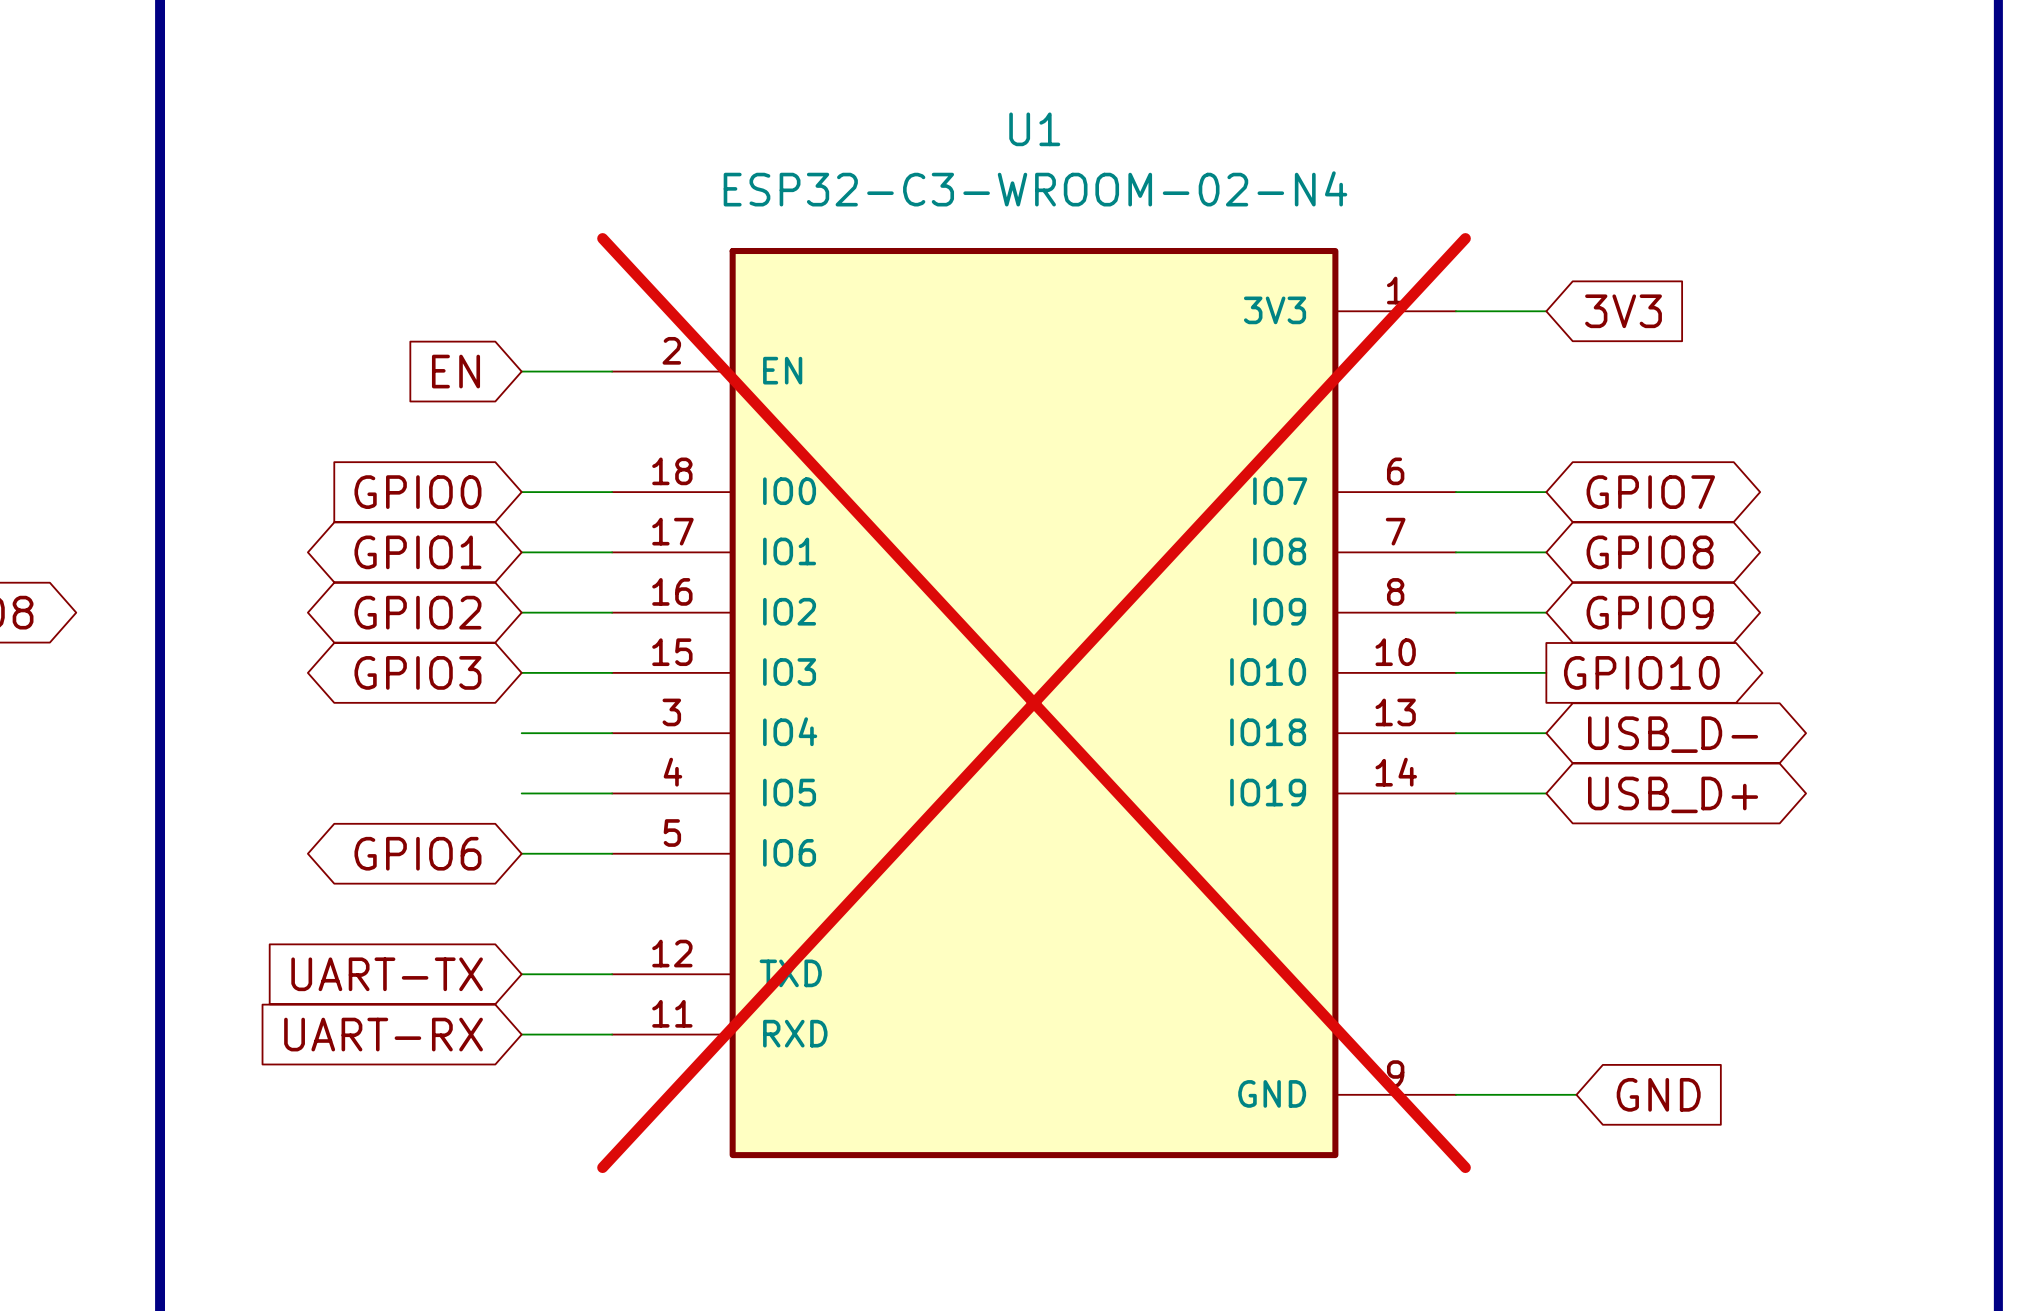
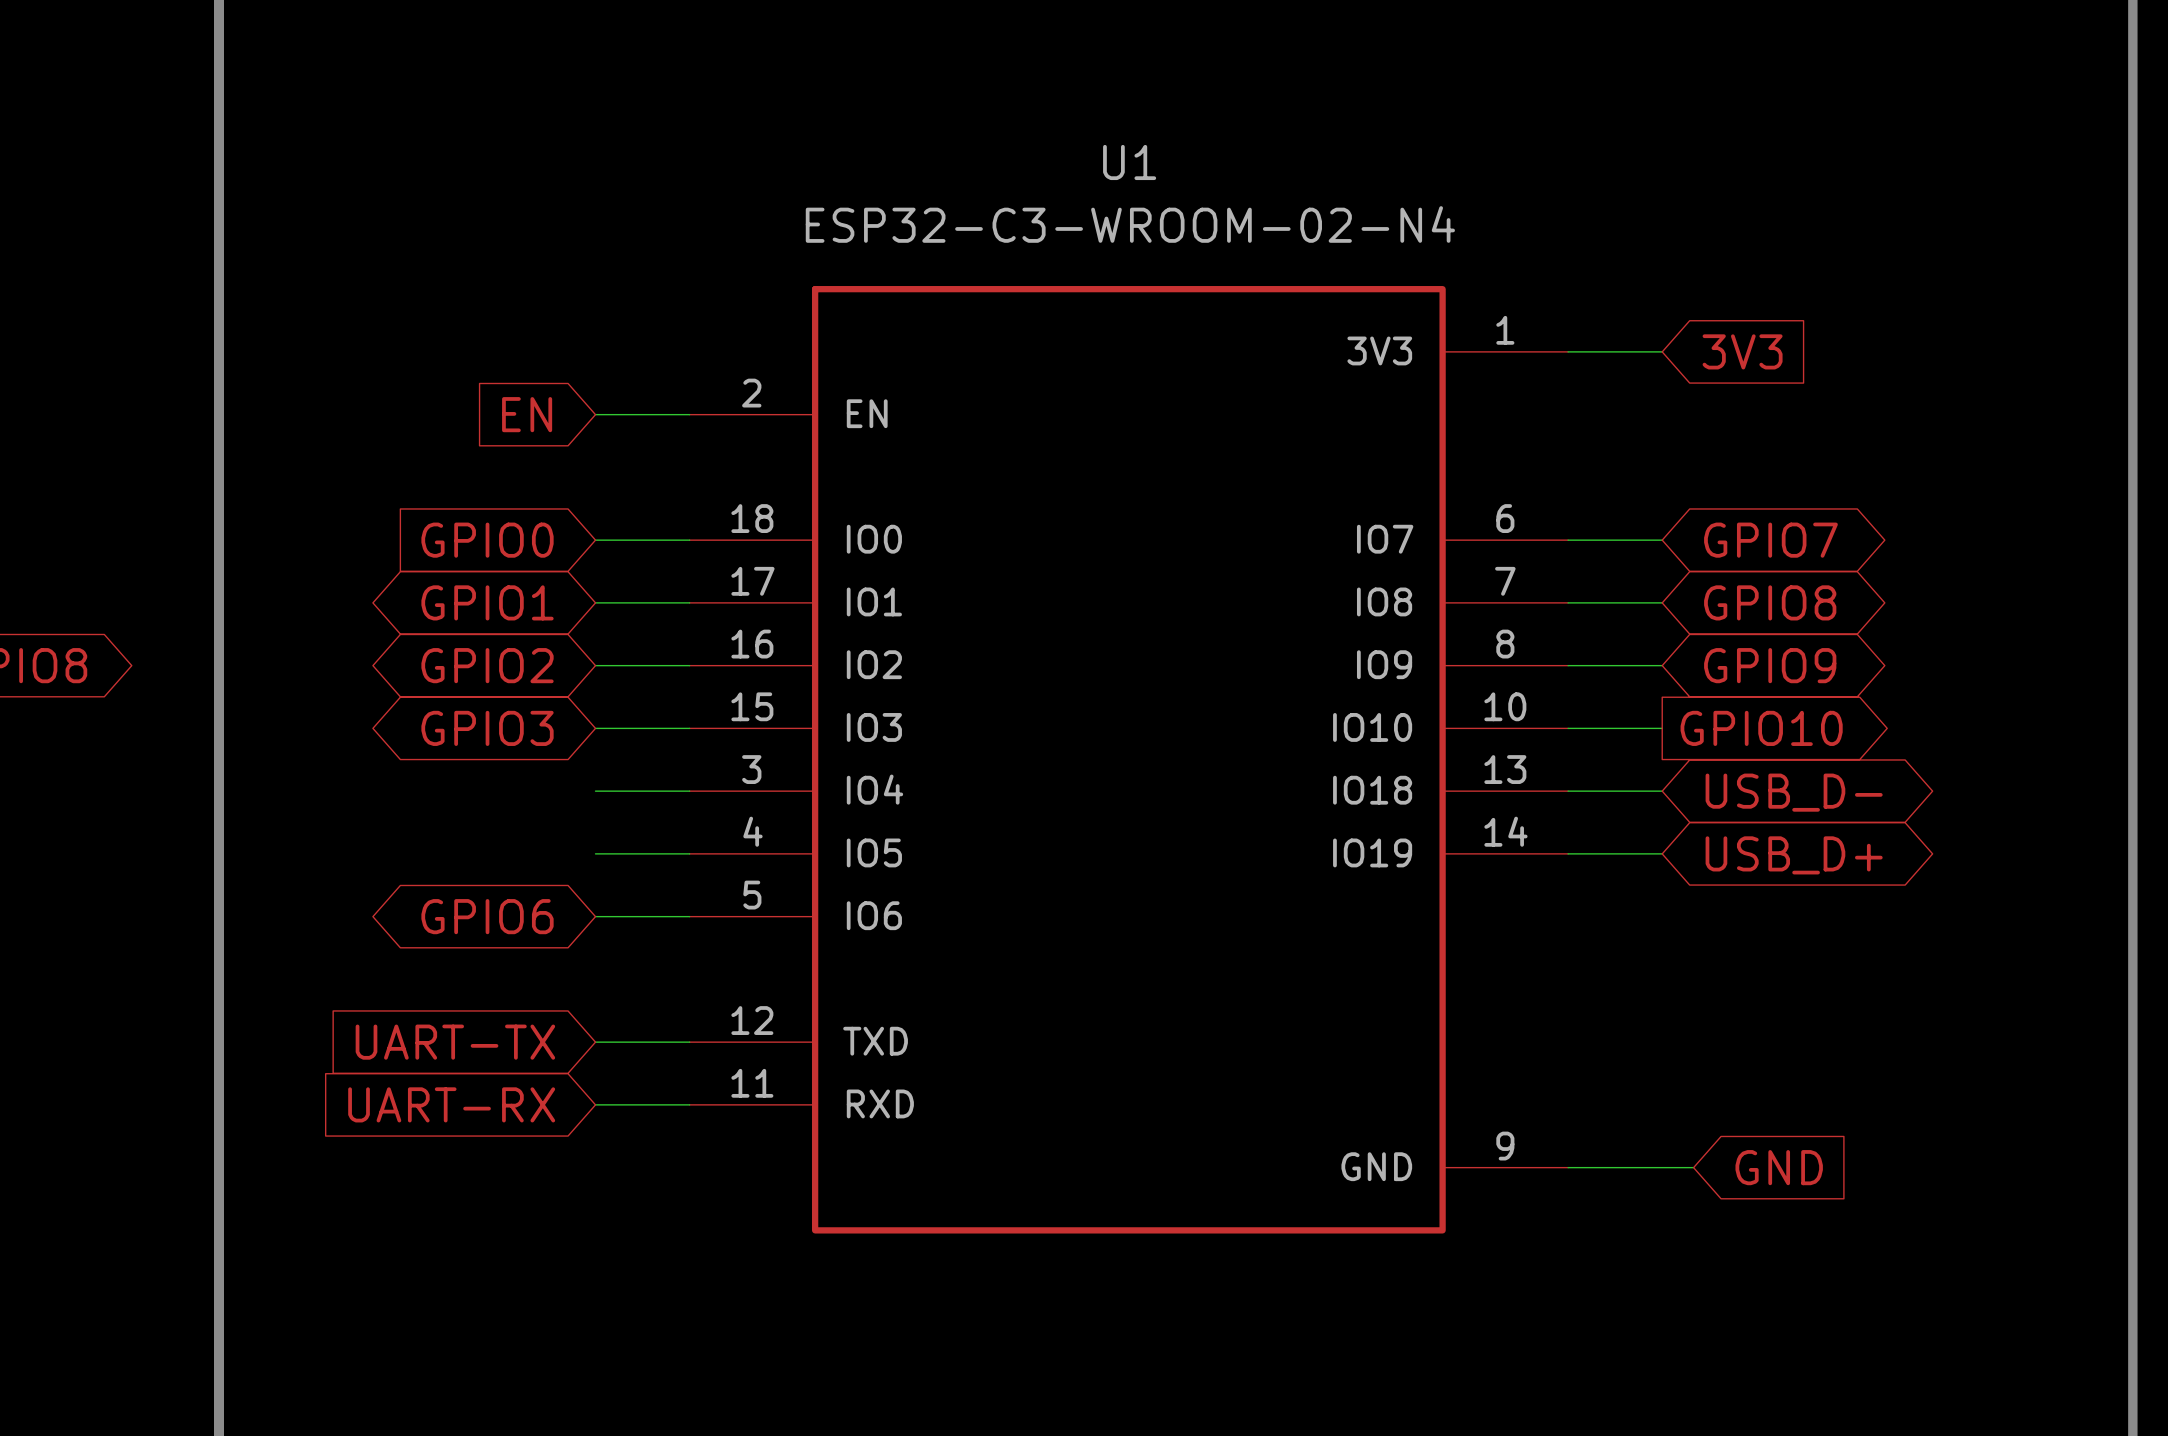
U1 do-not-place cross: (1034, 703) -> none

